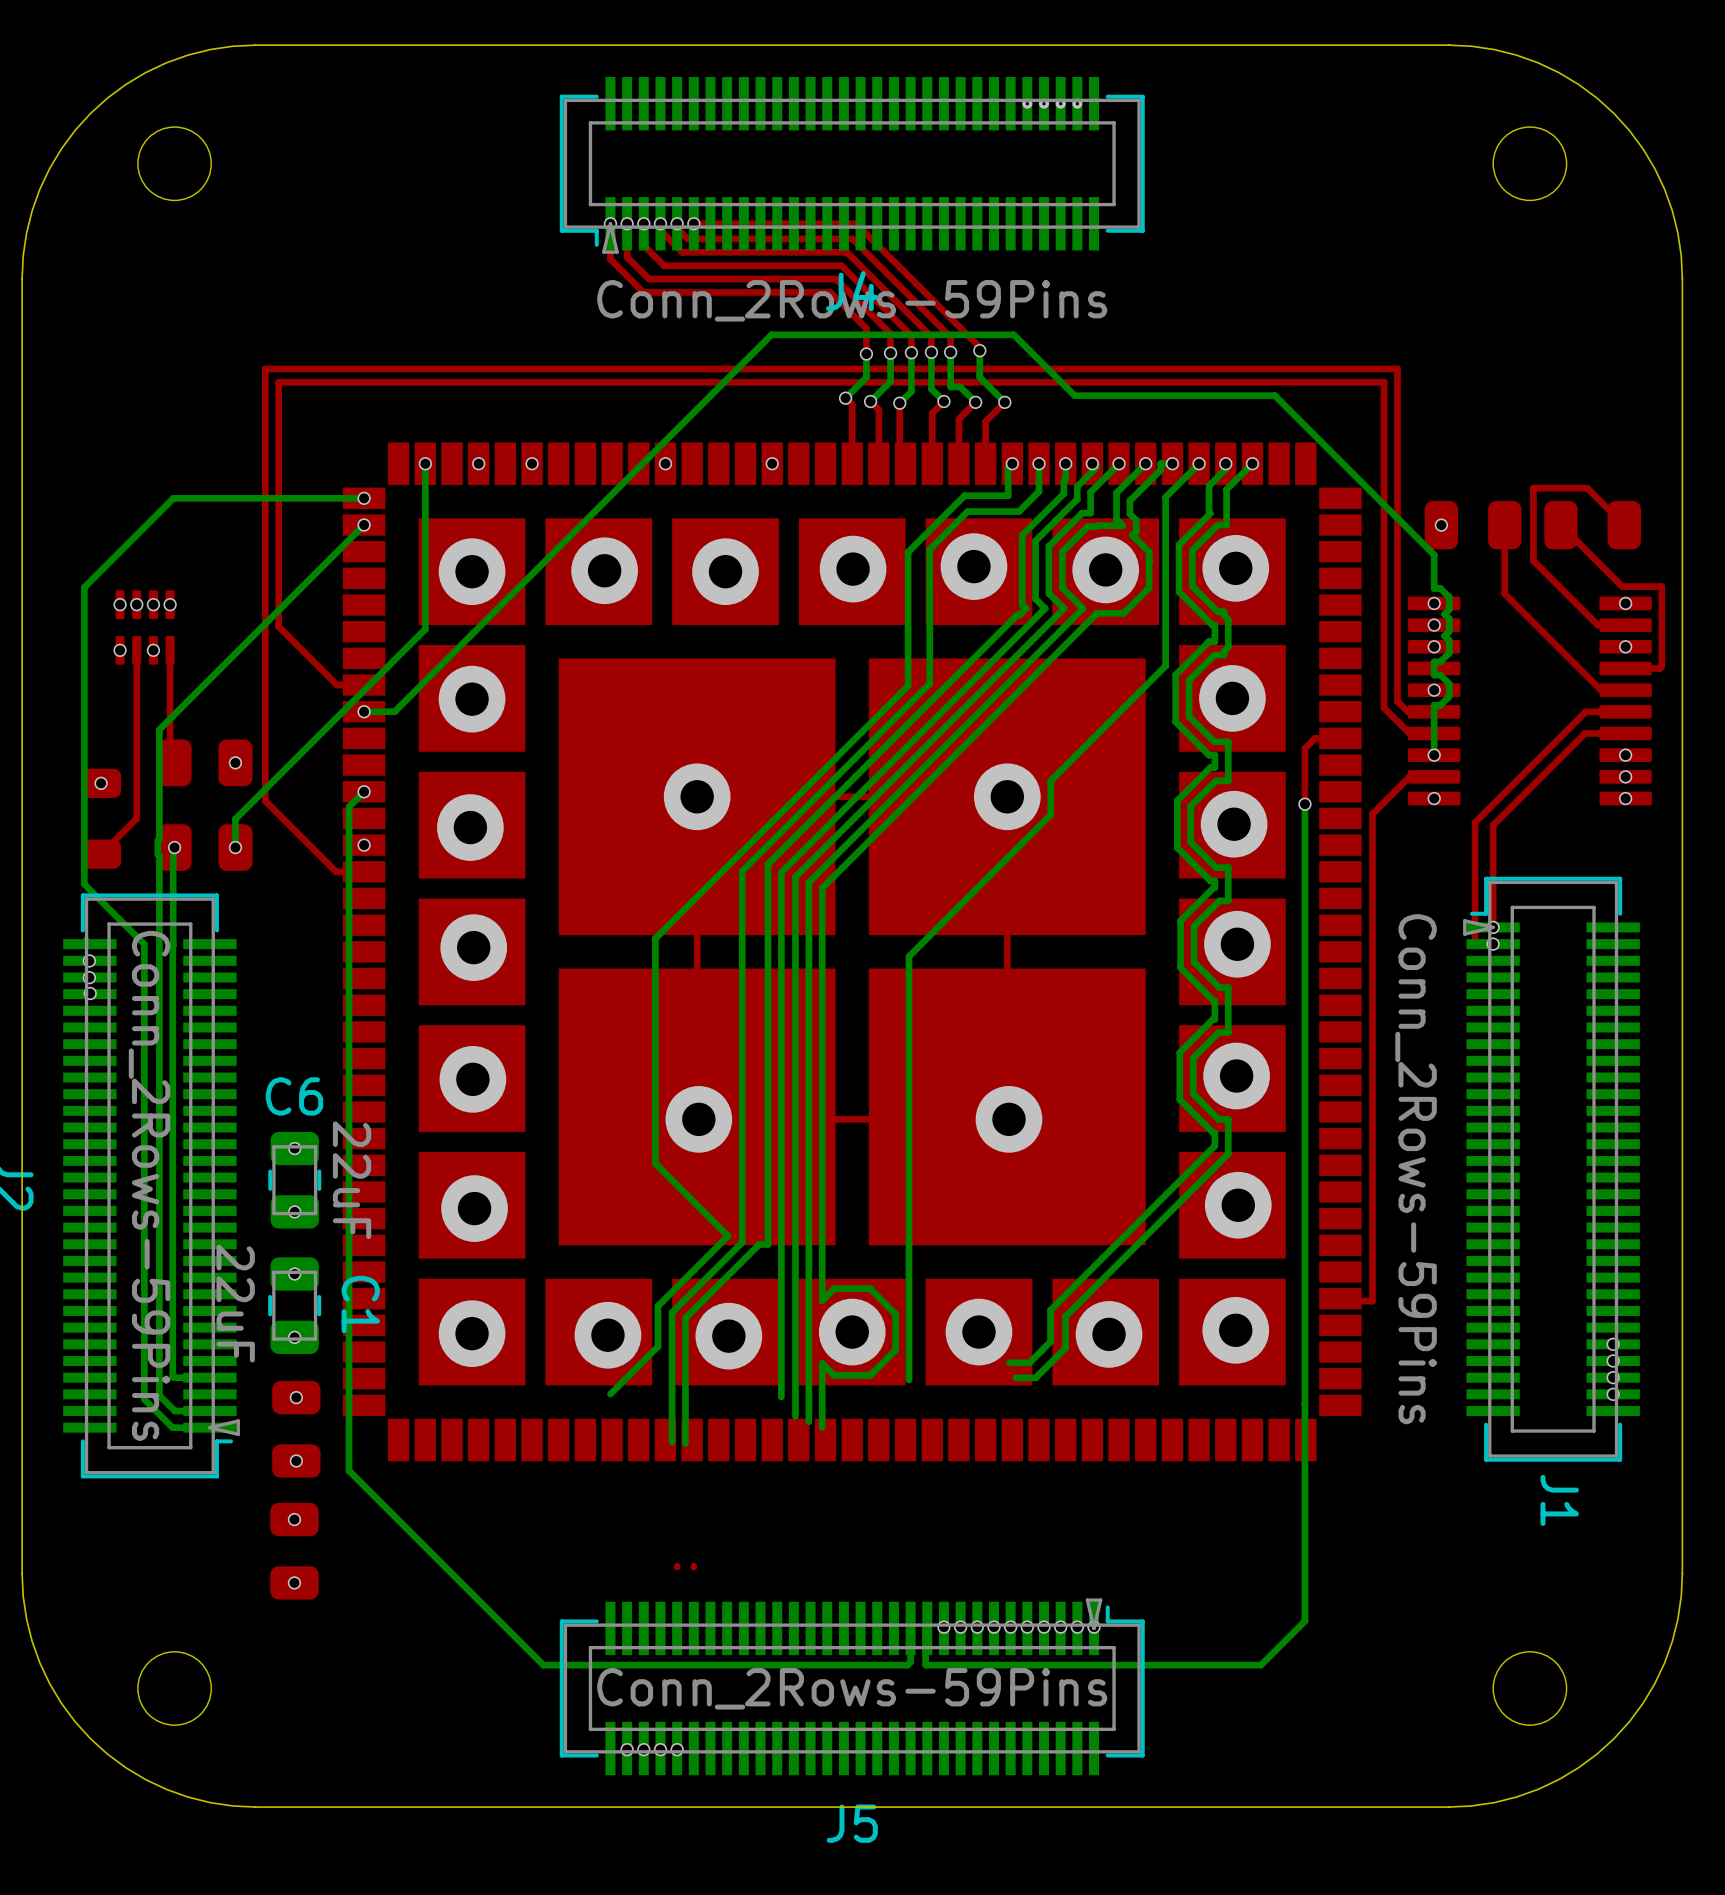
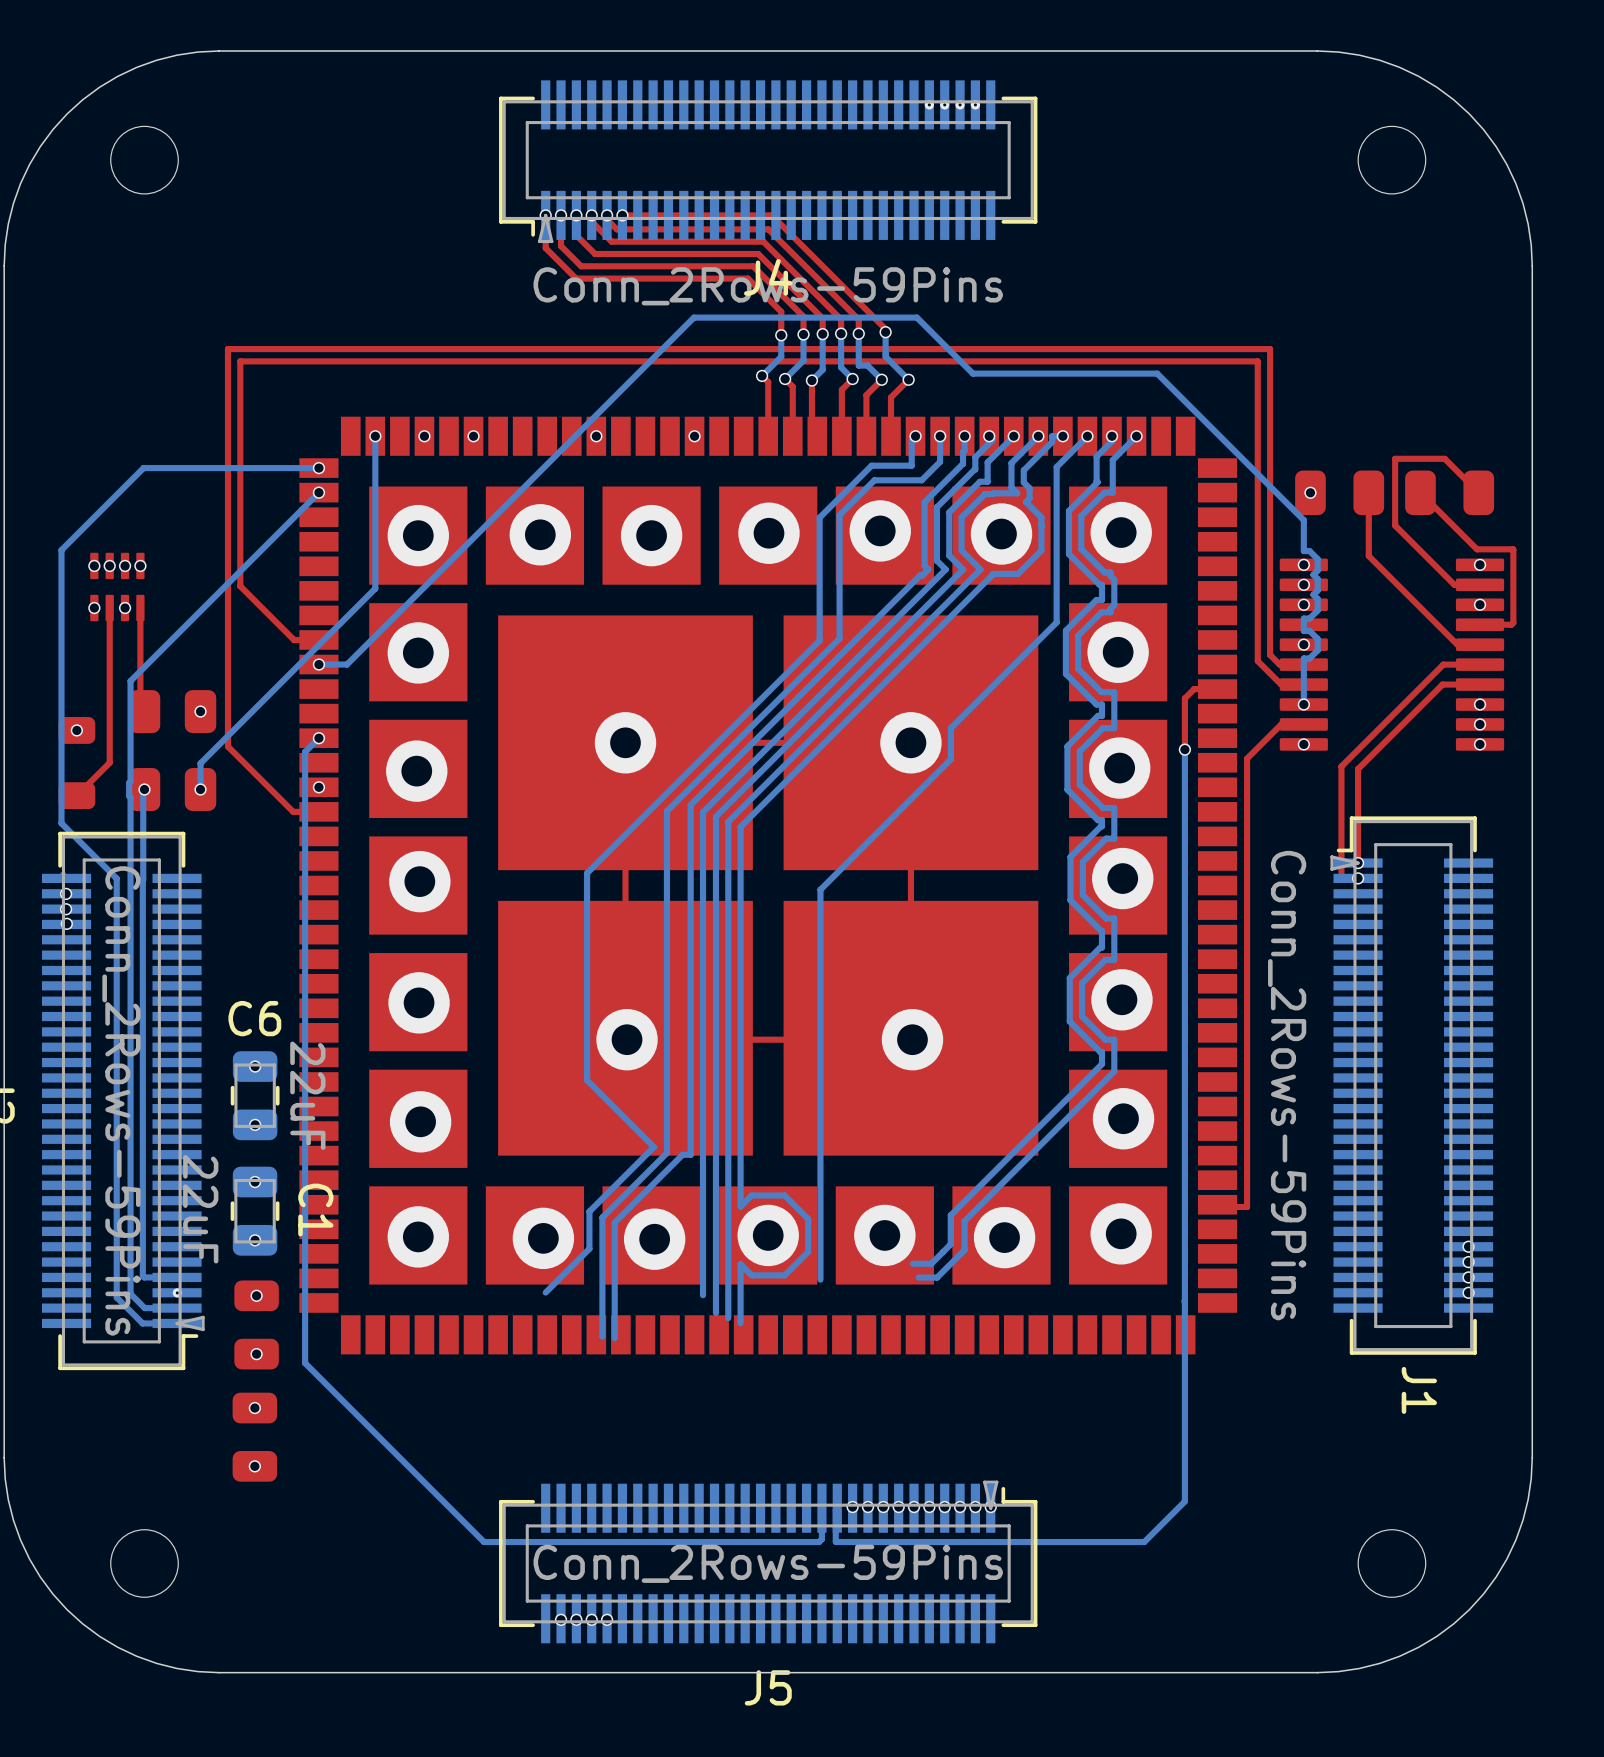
via: none -> (177, 1292)
top track: (677, 1566) (677, 1567) -> none
top track: (693, 1566) (693, 1567) -> none

